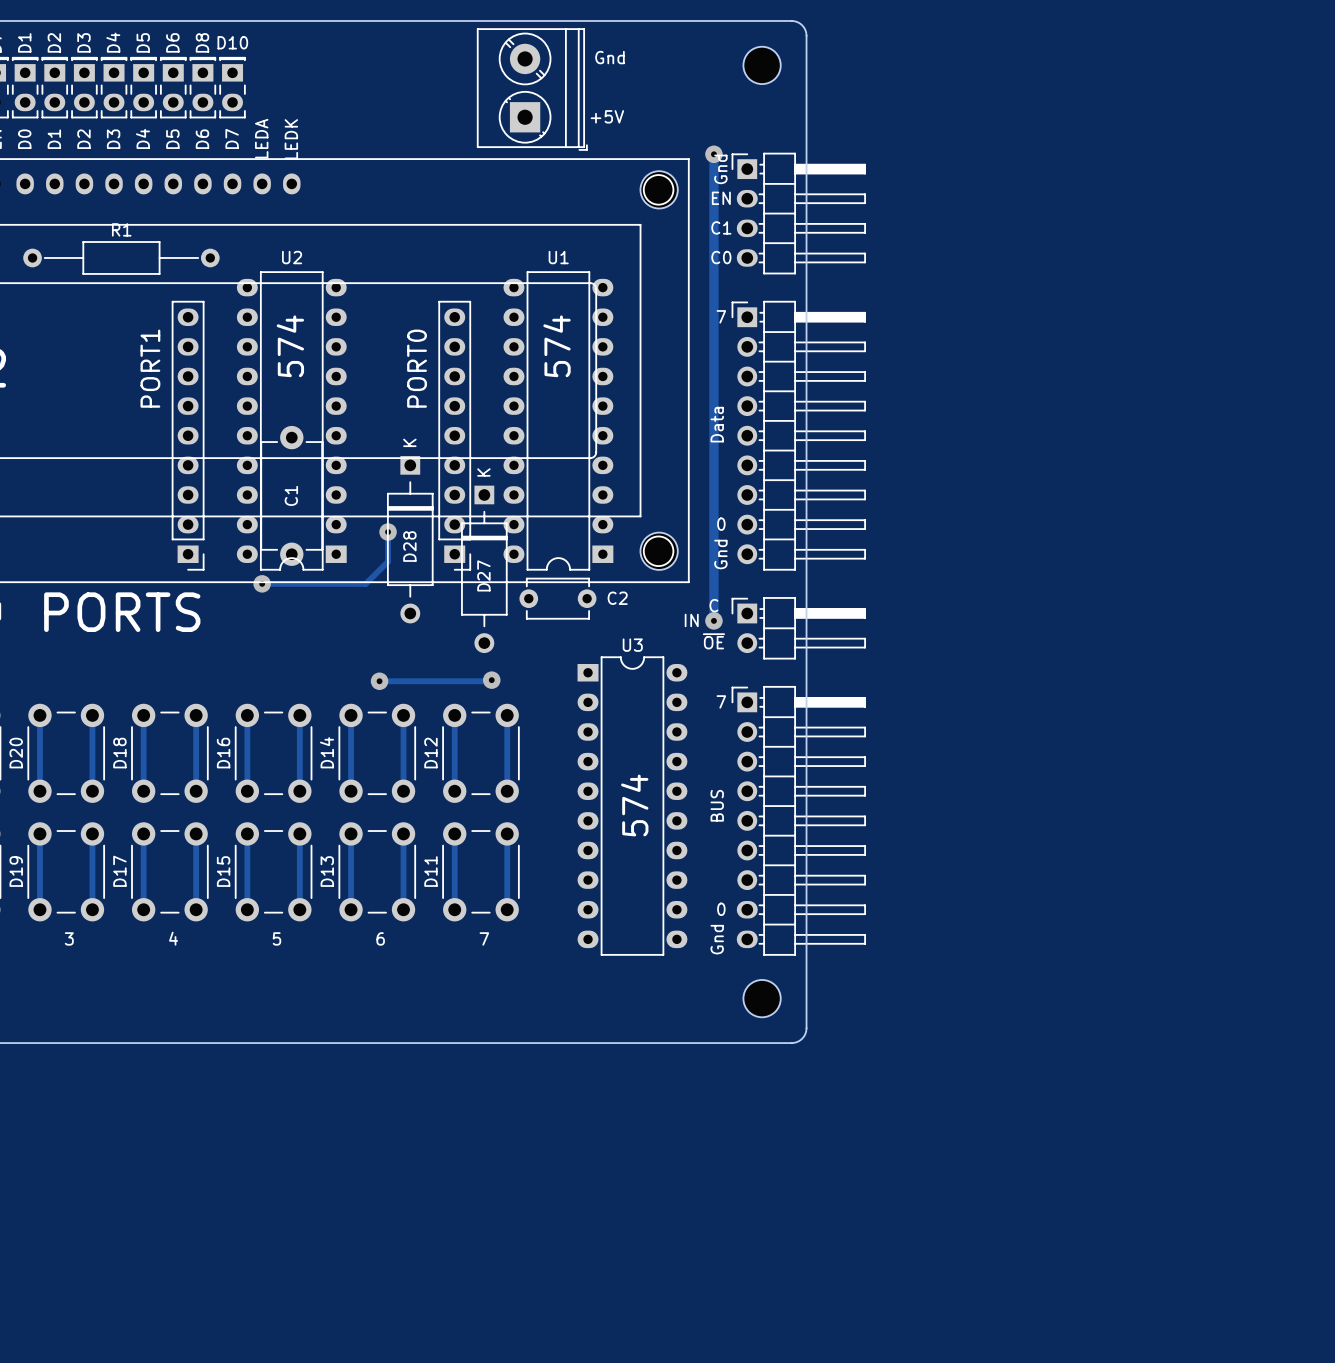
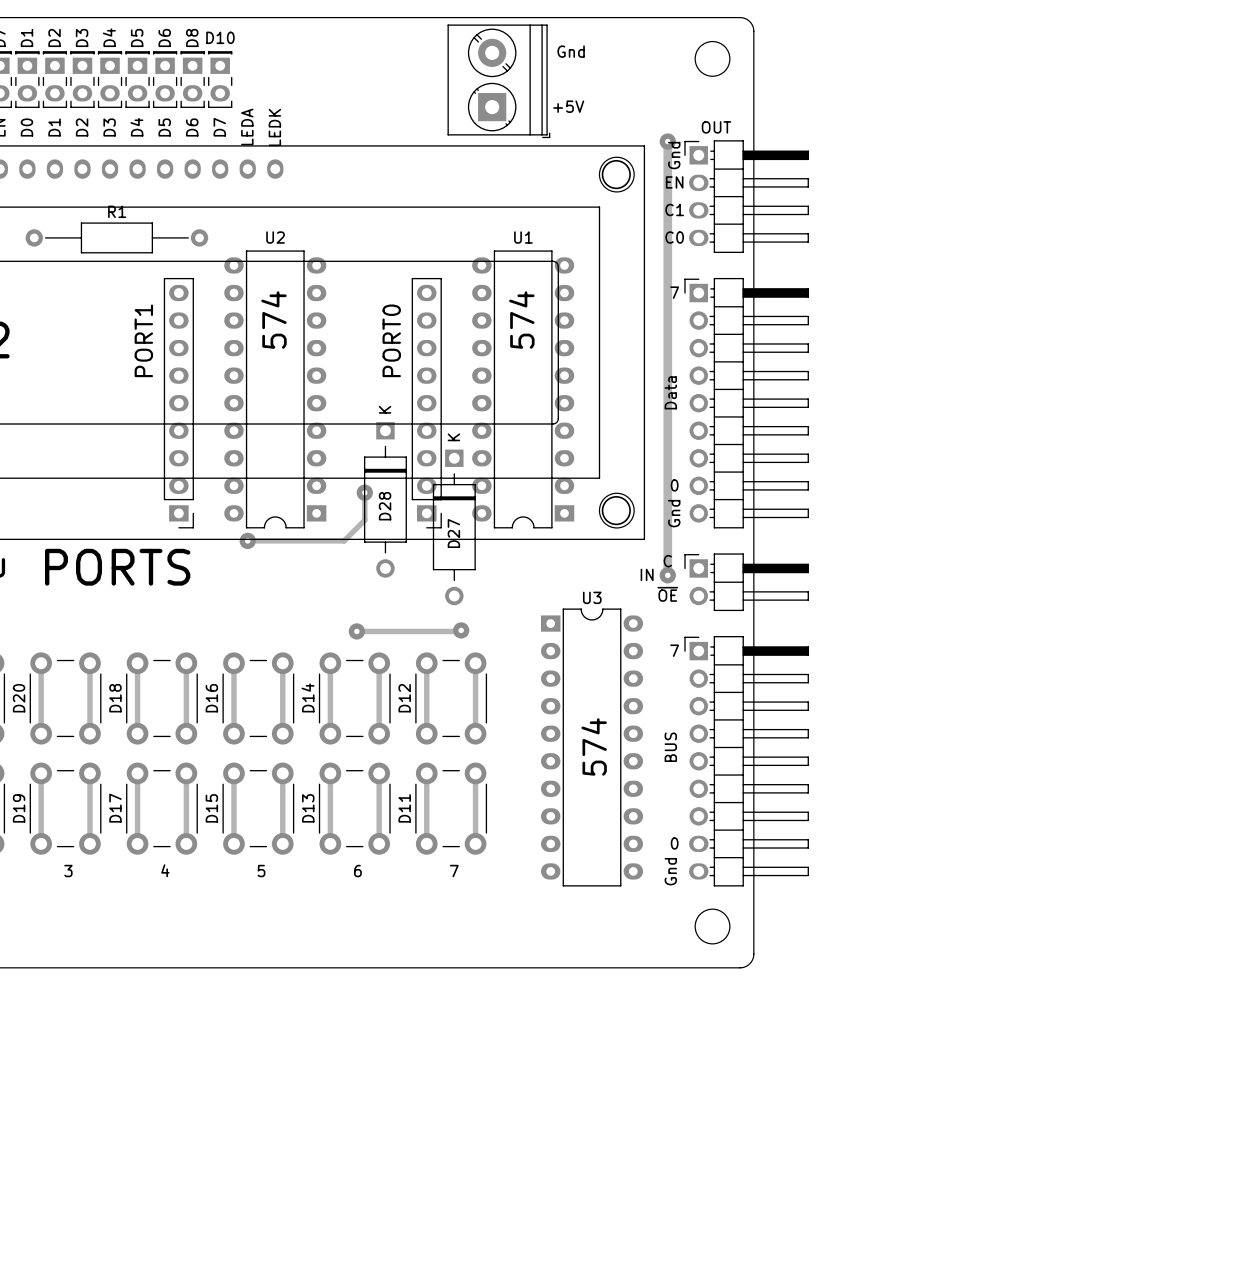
text: none -> OUT (716, 127)
C1: (291, 495) -> none
C2: (557, 598) -> none

